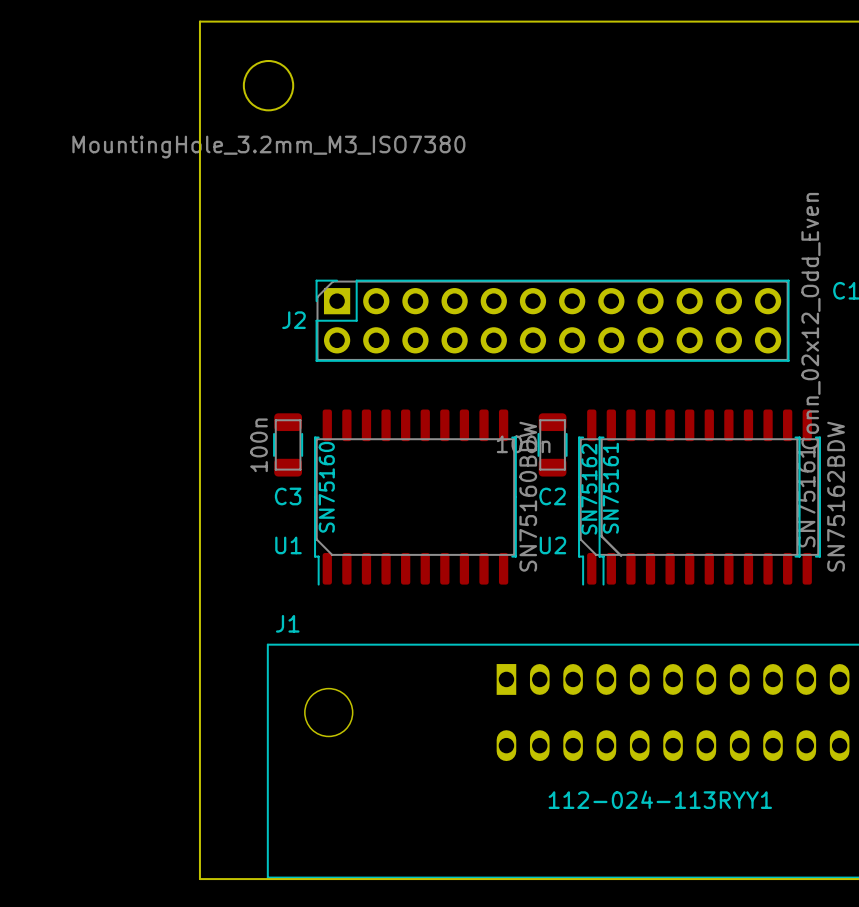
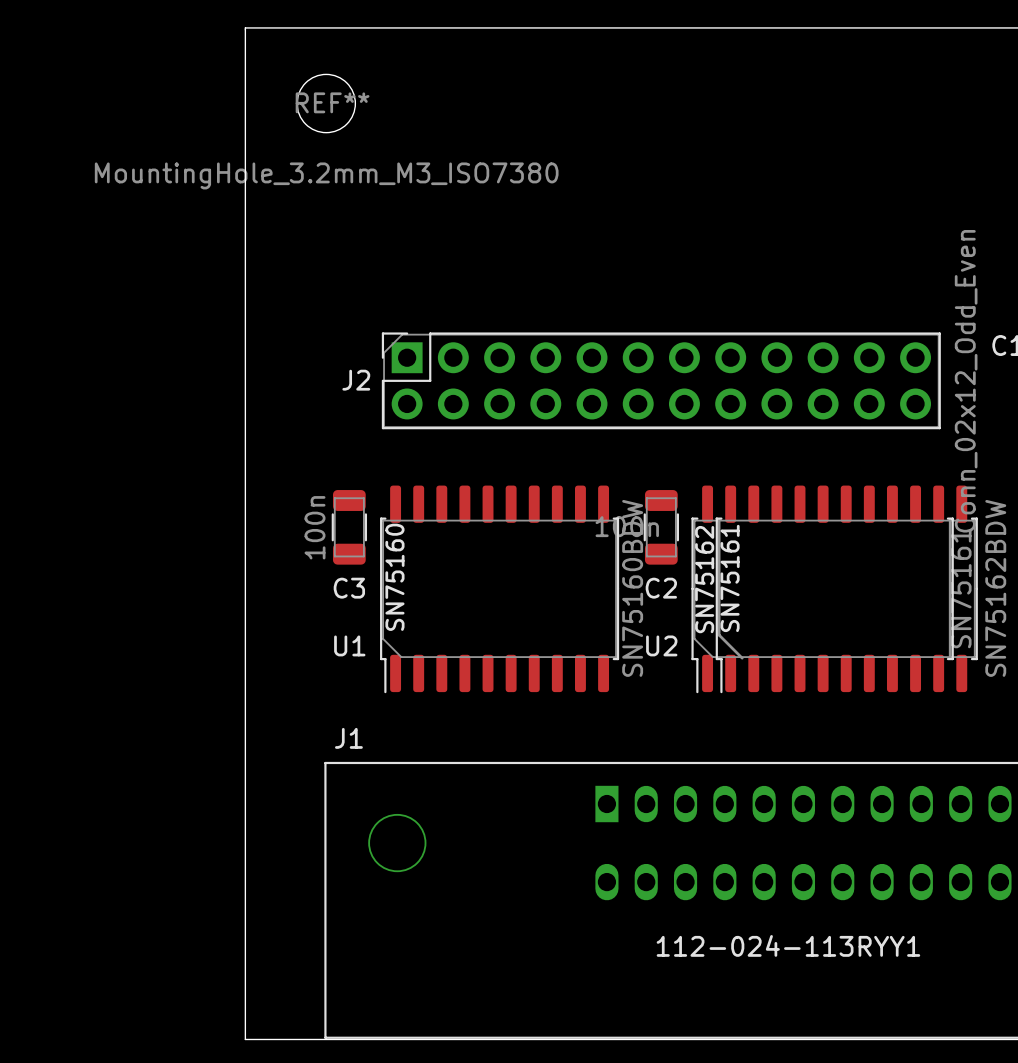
REF** name: none -> REF** (332, 102)

